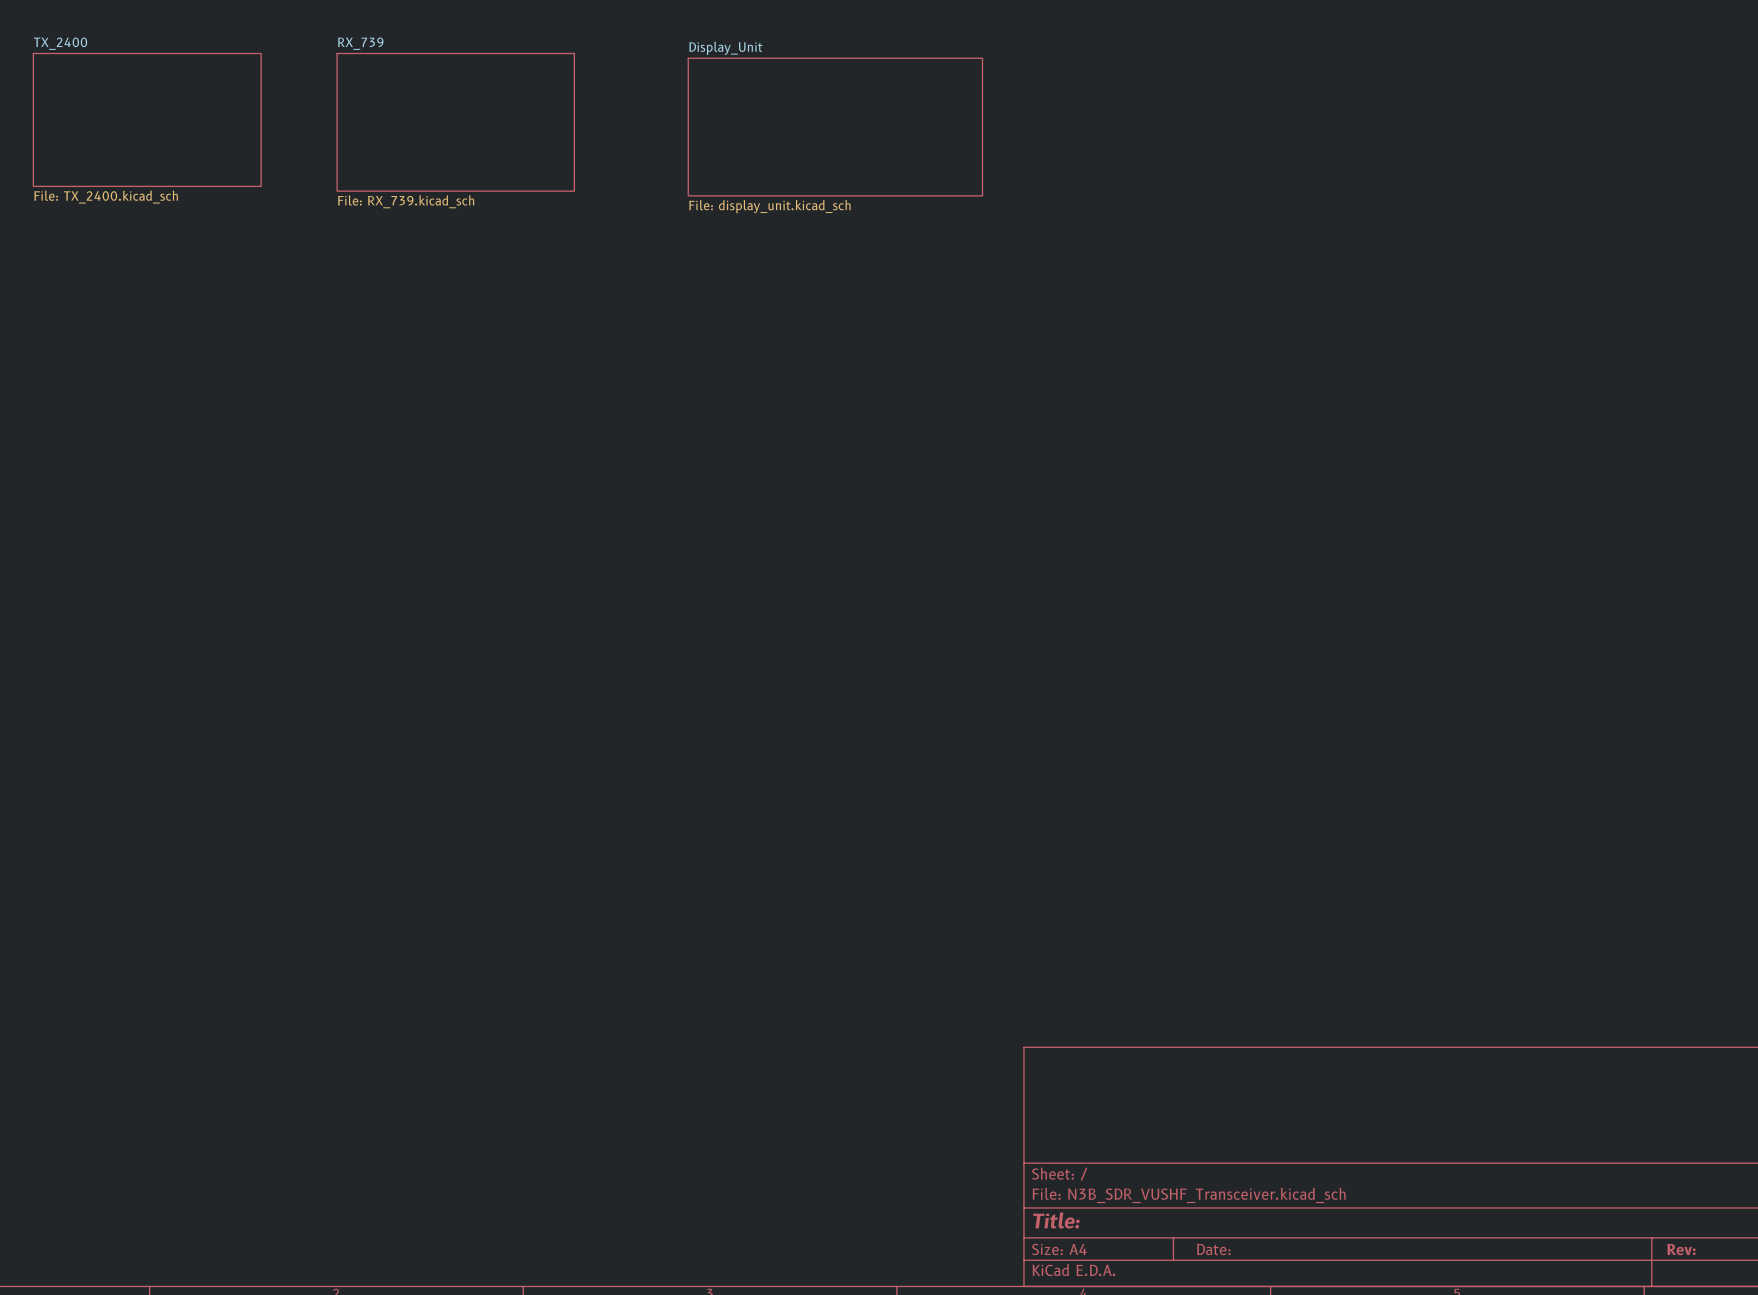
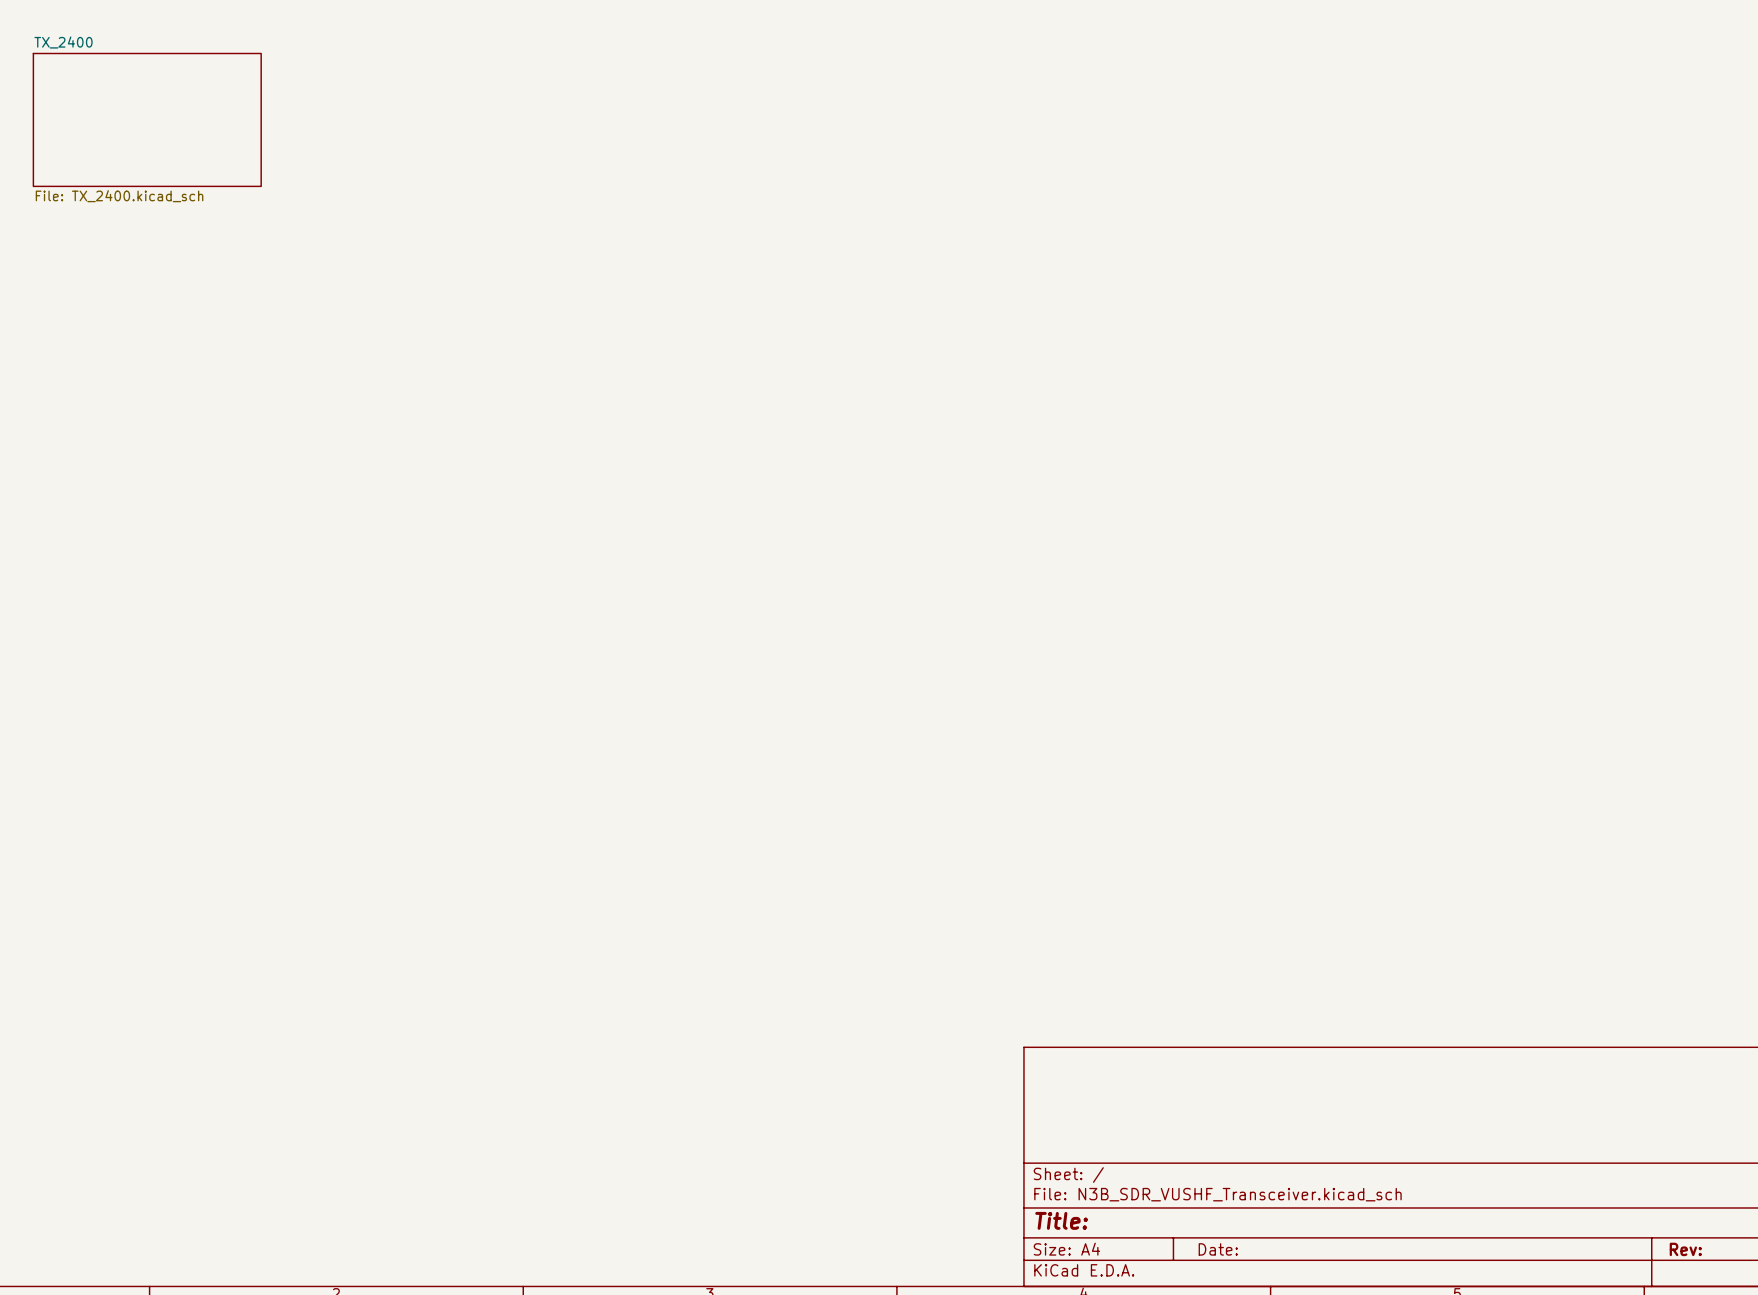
sheet RX_739: File: RX_739.kicad_sch (455, 122) -> none
sheet Display_Unit: File: display_unit.kicad_sch (835, 127) -> none

